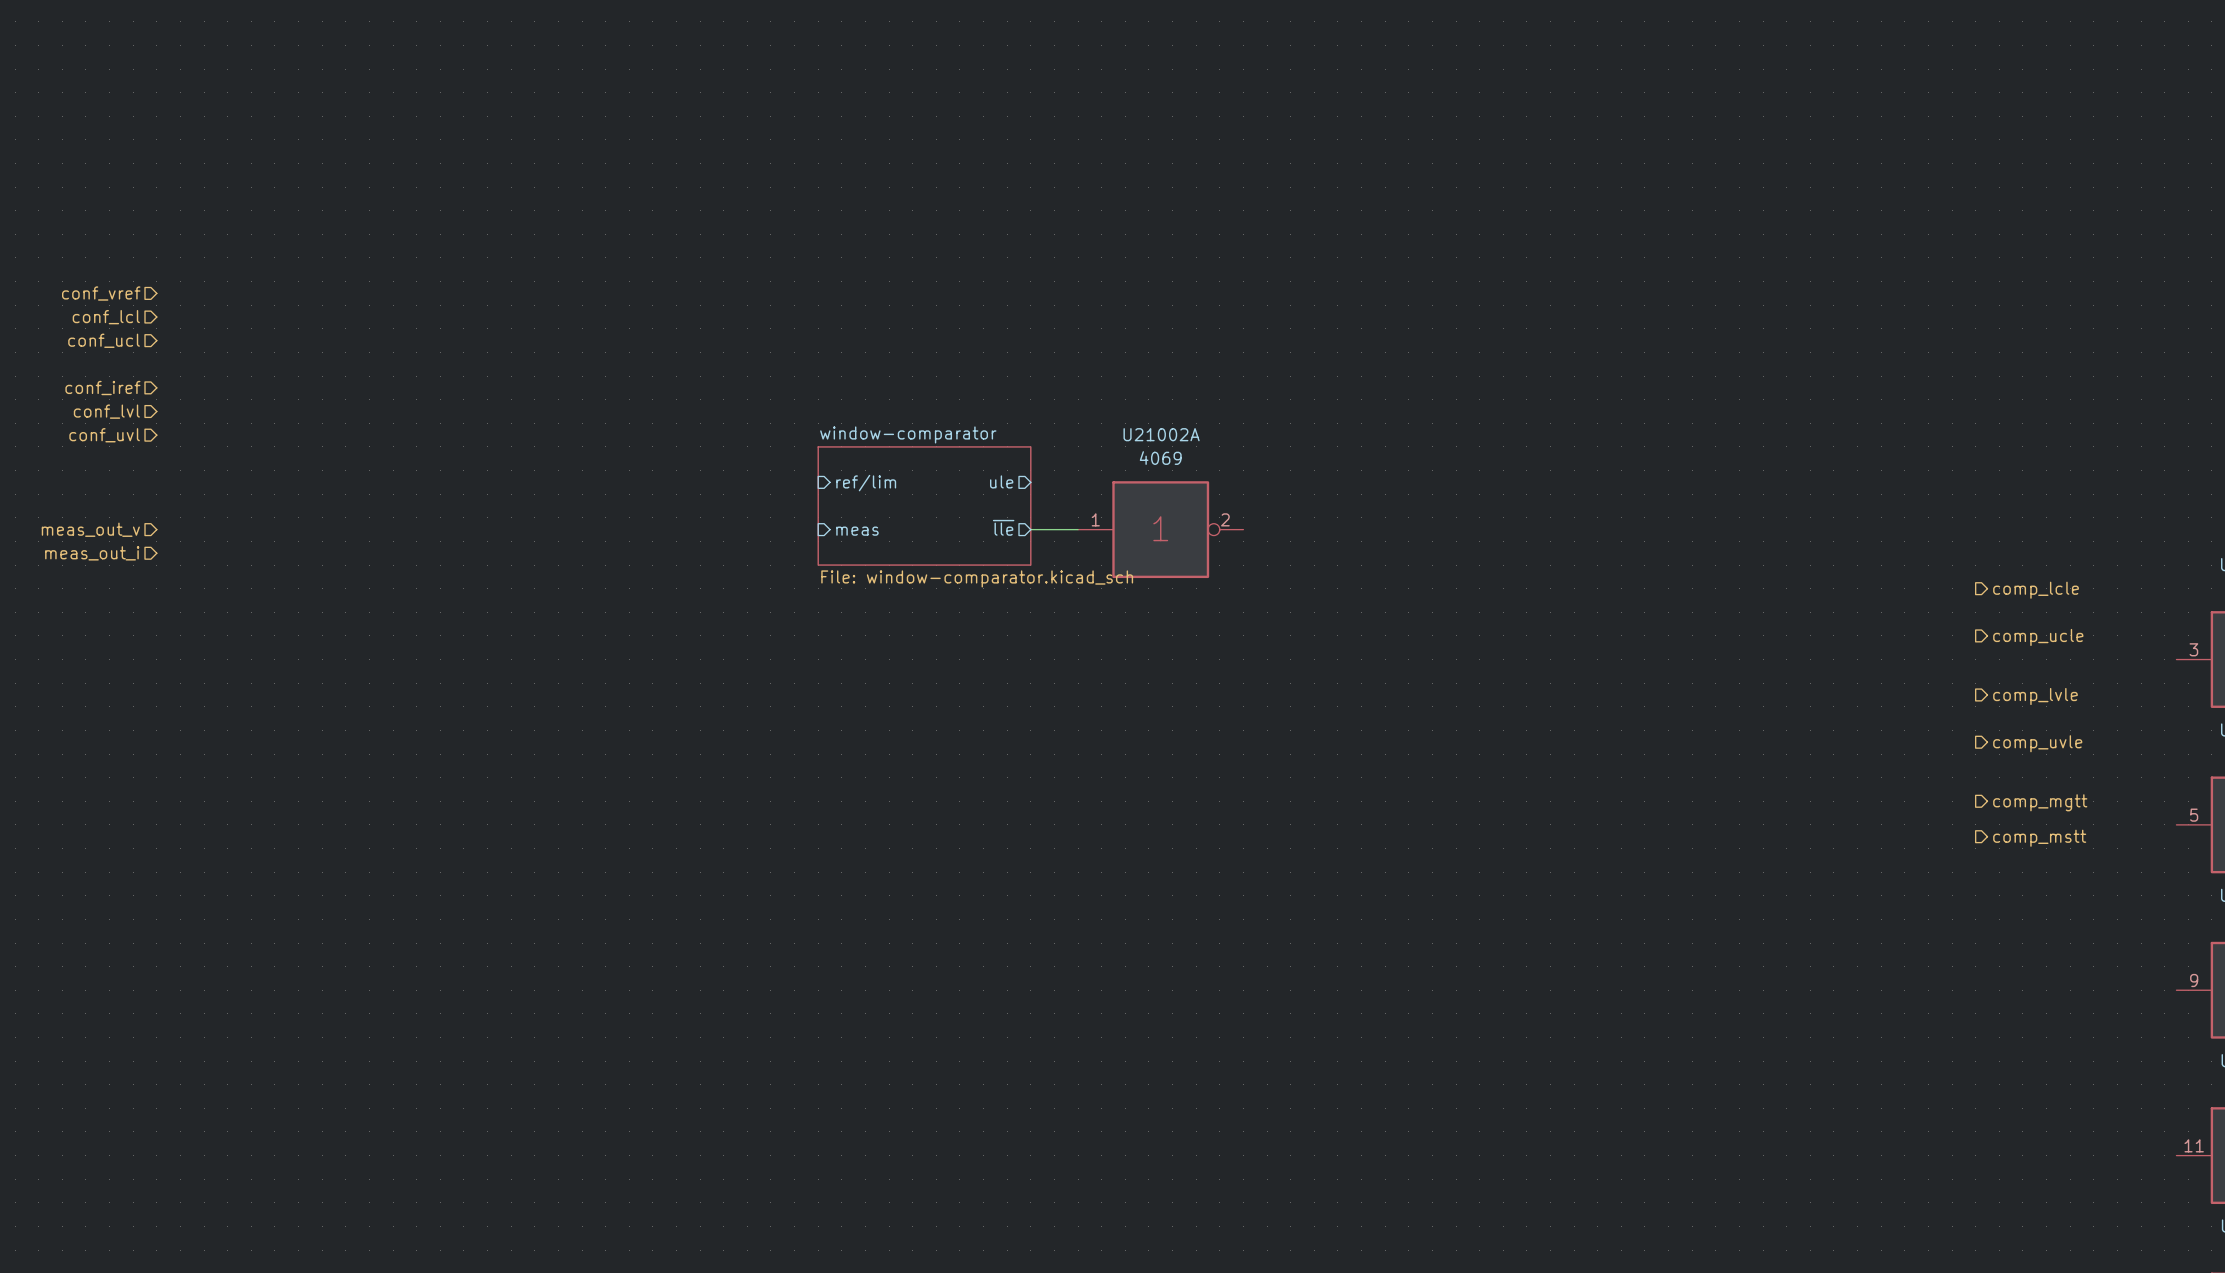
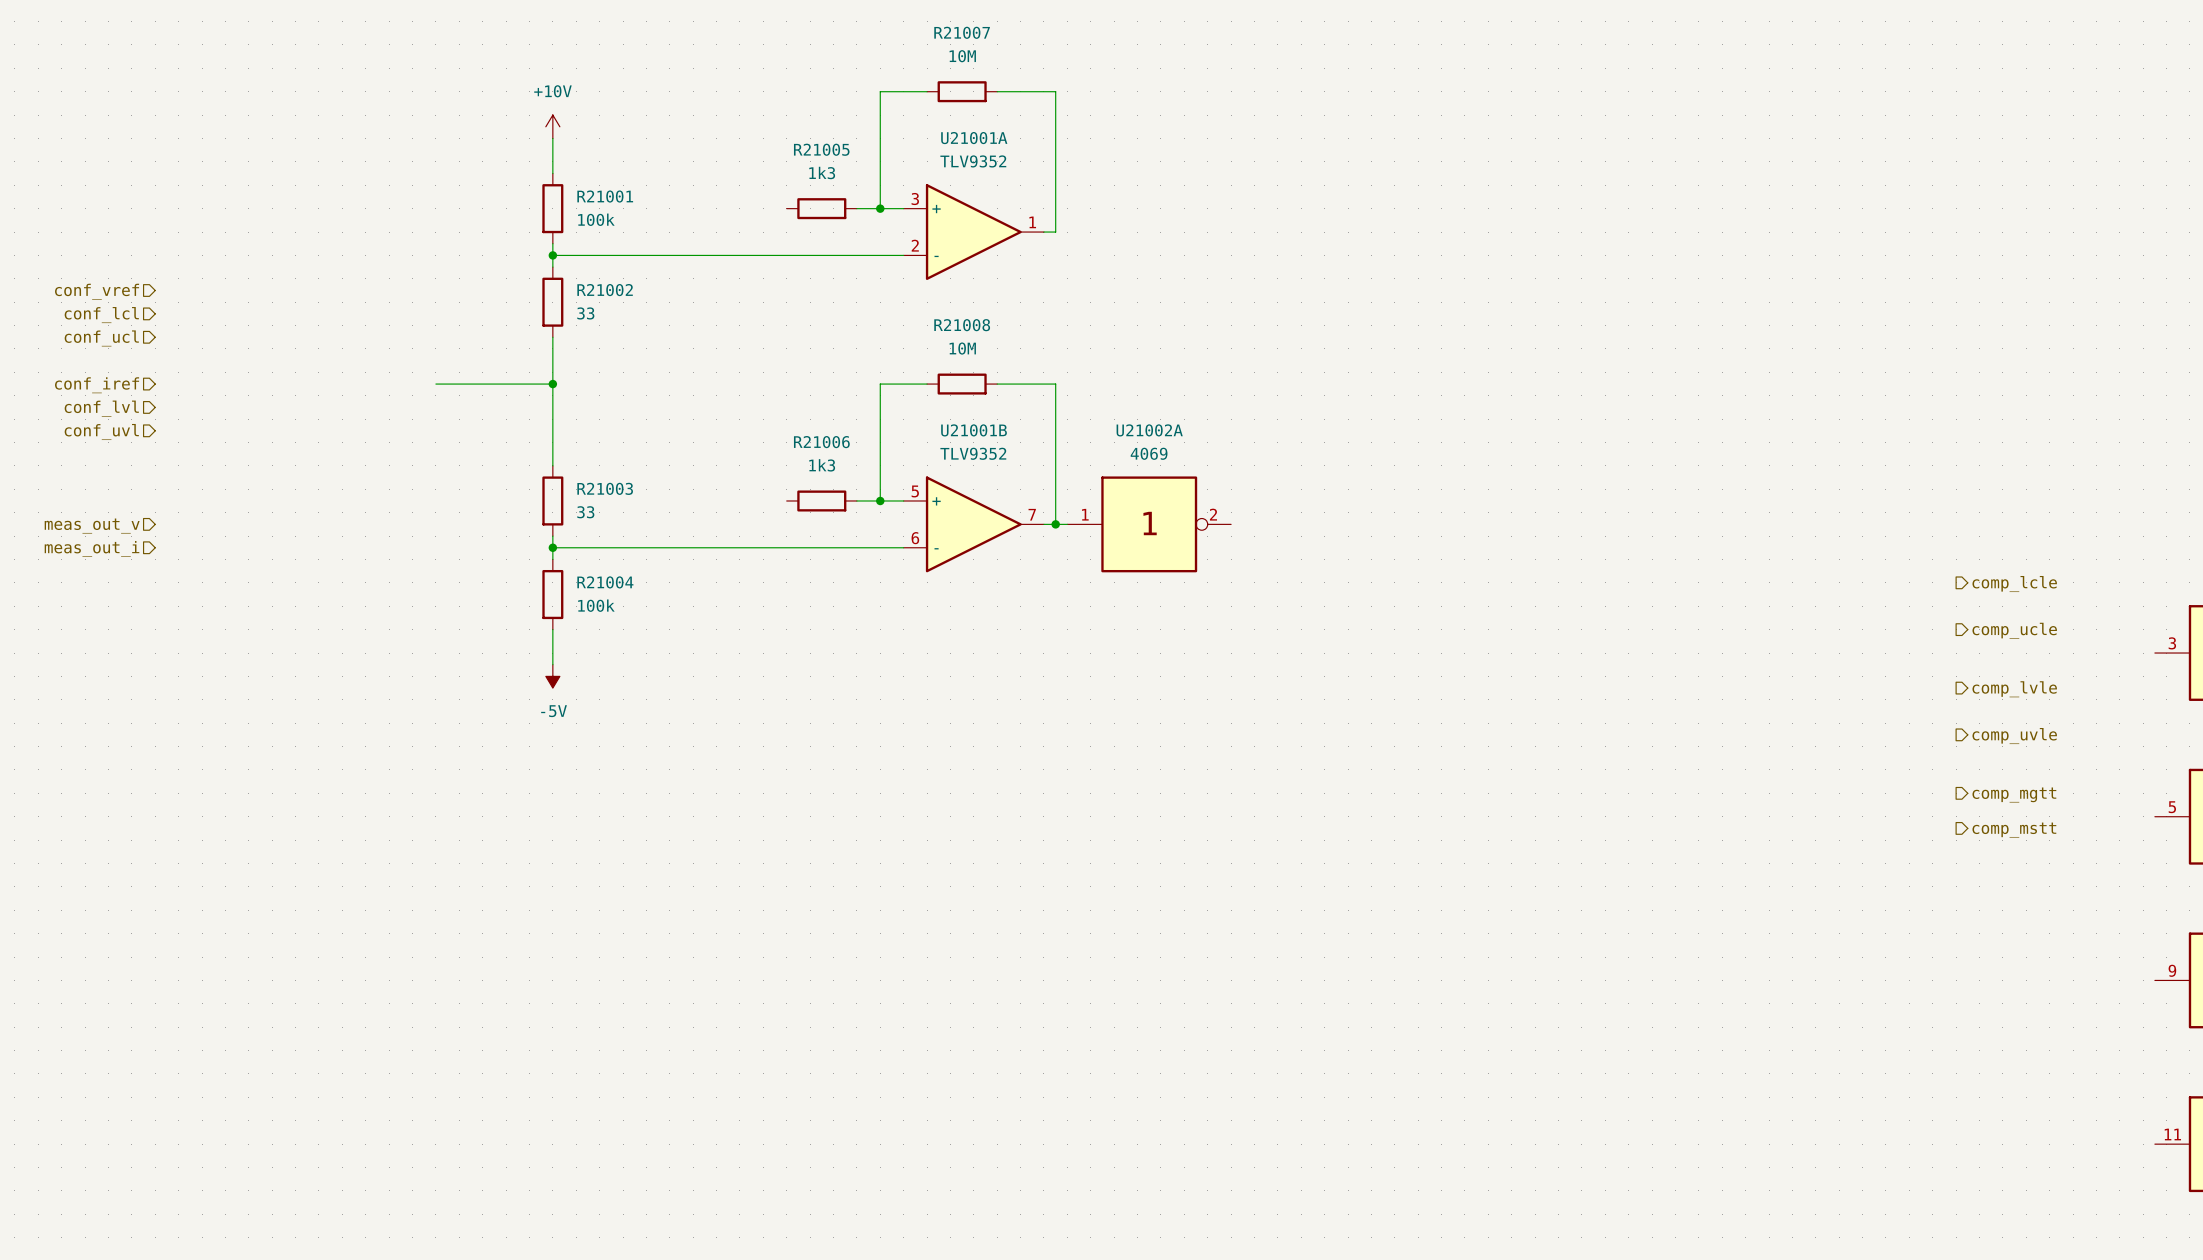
wire: none -> (927, 91) (880, 91) (880, 208)
R21007: none -> 10M (962, 91)
wire: none -> (997, 91) (1055, 91) (1055, 232) (1043, 232)
power symbol: none -> +10V (552, 126)
wire: none -> (552, 138) (552, 173)
R21001: none -> 100k (552, 208)
R21005: none -> 1k3 (821, 208)
wire: none -> (856, 208) (903, 208)
junction: none -> (880, 208)
U21001A: none -> TLV9352 (973, 232)
wire: none -> (552, 243) (552, 267)
wire: none -> (552, 255) (903, 255)
junction: none -> (552, 255)
R21002: none -> 33 (552, 302)
wire: none -> (552, 337) (552, 465)
wire: none -> (435, 384) (552, 384)
junction: none -> (552, 384)
wire: none -> (927, 384) (880, 384) (880, 500)
R21008: none -> 10M (962, 384)
wire: none -> (997, 384) (1055, 384) (1055, 524)
sheet pin: ule (1001, 481) -> none
sheet pin: ref/lim (866, 483) -> none
R21003: none -> 33 (552, 500)
R21006: none -> 1k3 (821, 500)
wire: none -> (856, 500) (903, 500)
junction: none -> (880, 500)
sheet window-comparator: File: window-comparator.kicad_sch (924, 506) -> none
sheet pin: ~{lle} (1003, 527) -> none
U21001B: none -> TLV9352 (973, 524)
junction: none -> (1055, 524)
sheet pin: meas (857, 531) -> none
wire: none -> (552, 536) (552, 559)
wire: none -> (552, 547) (903, 547)
junction: none -> (552, 547)
R21004: none -> 100k (552, 594)
wire: none -> (552, 629) (552, 664)
power symbol: none -> -5V (552, 676)

